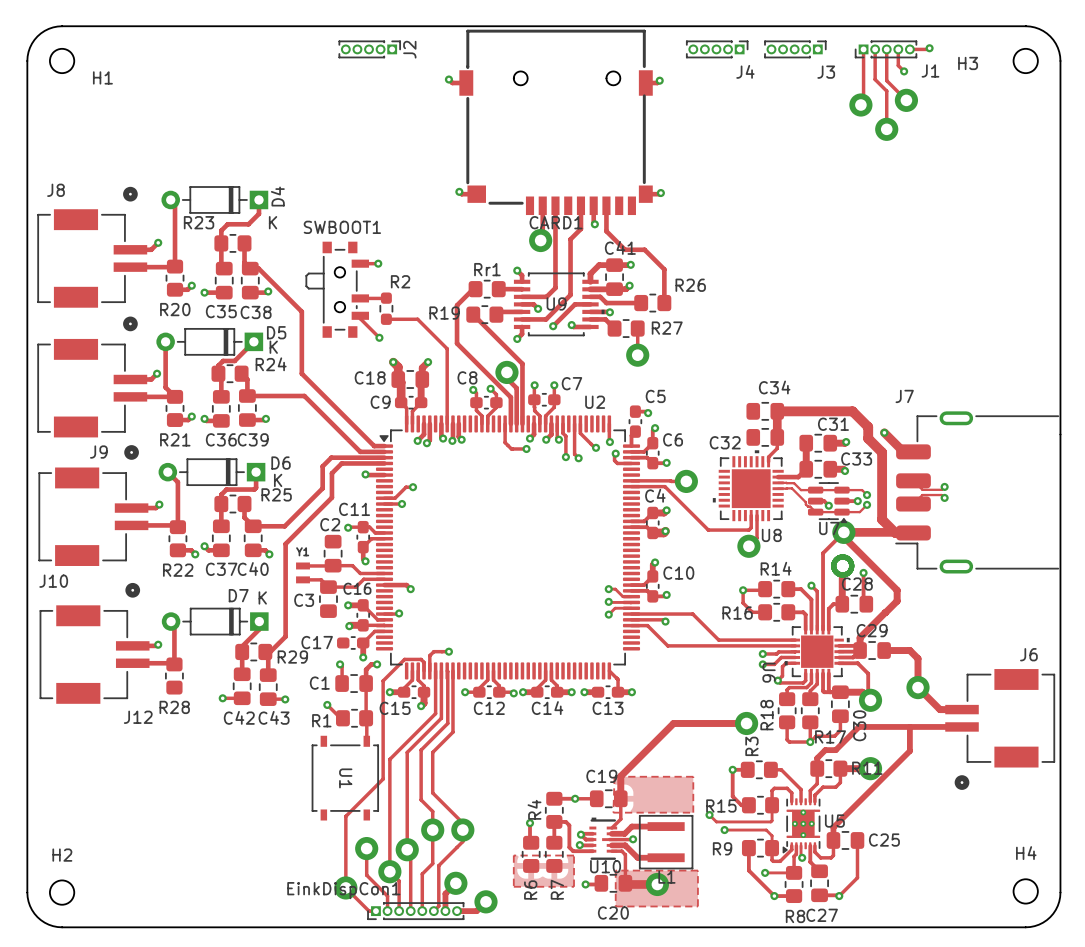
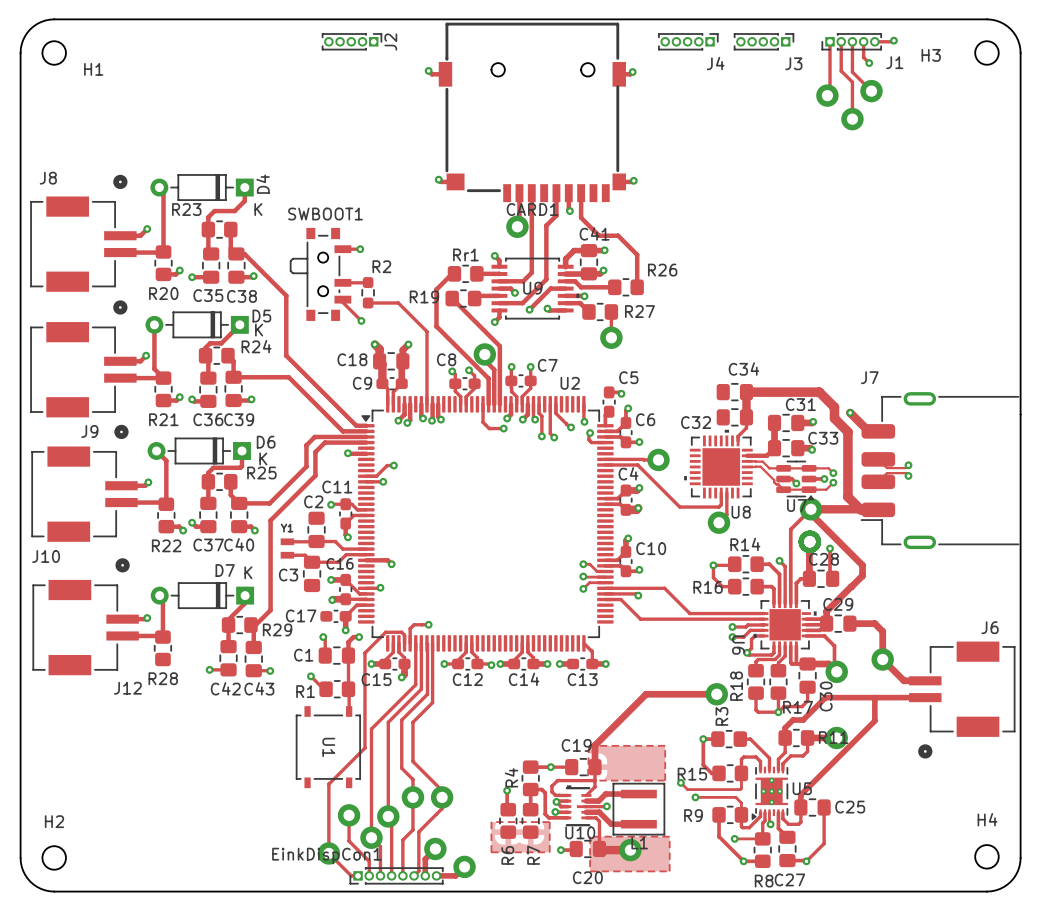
track: none -> (595, 780) (557, 780) (551, 786) (551, 791) (555, 795) (567, 795)

